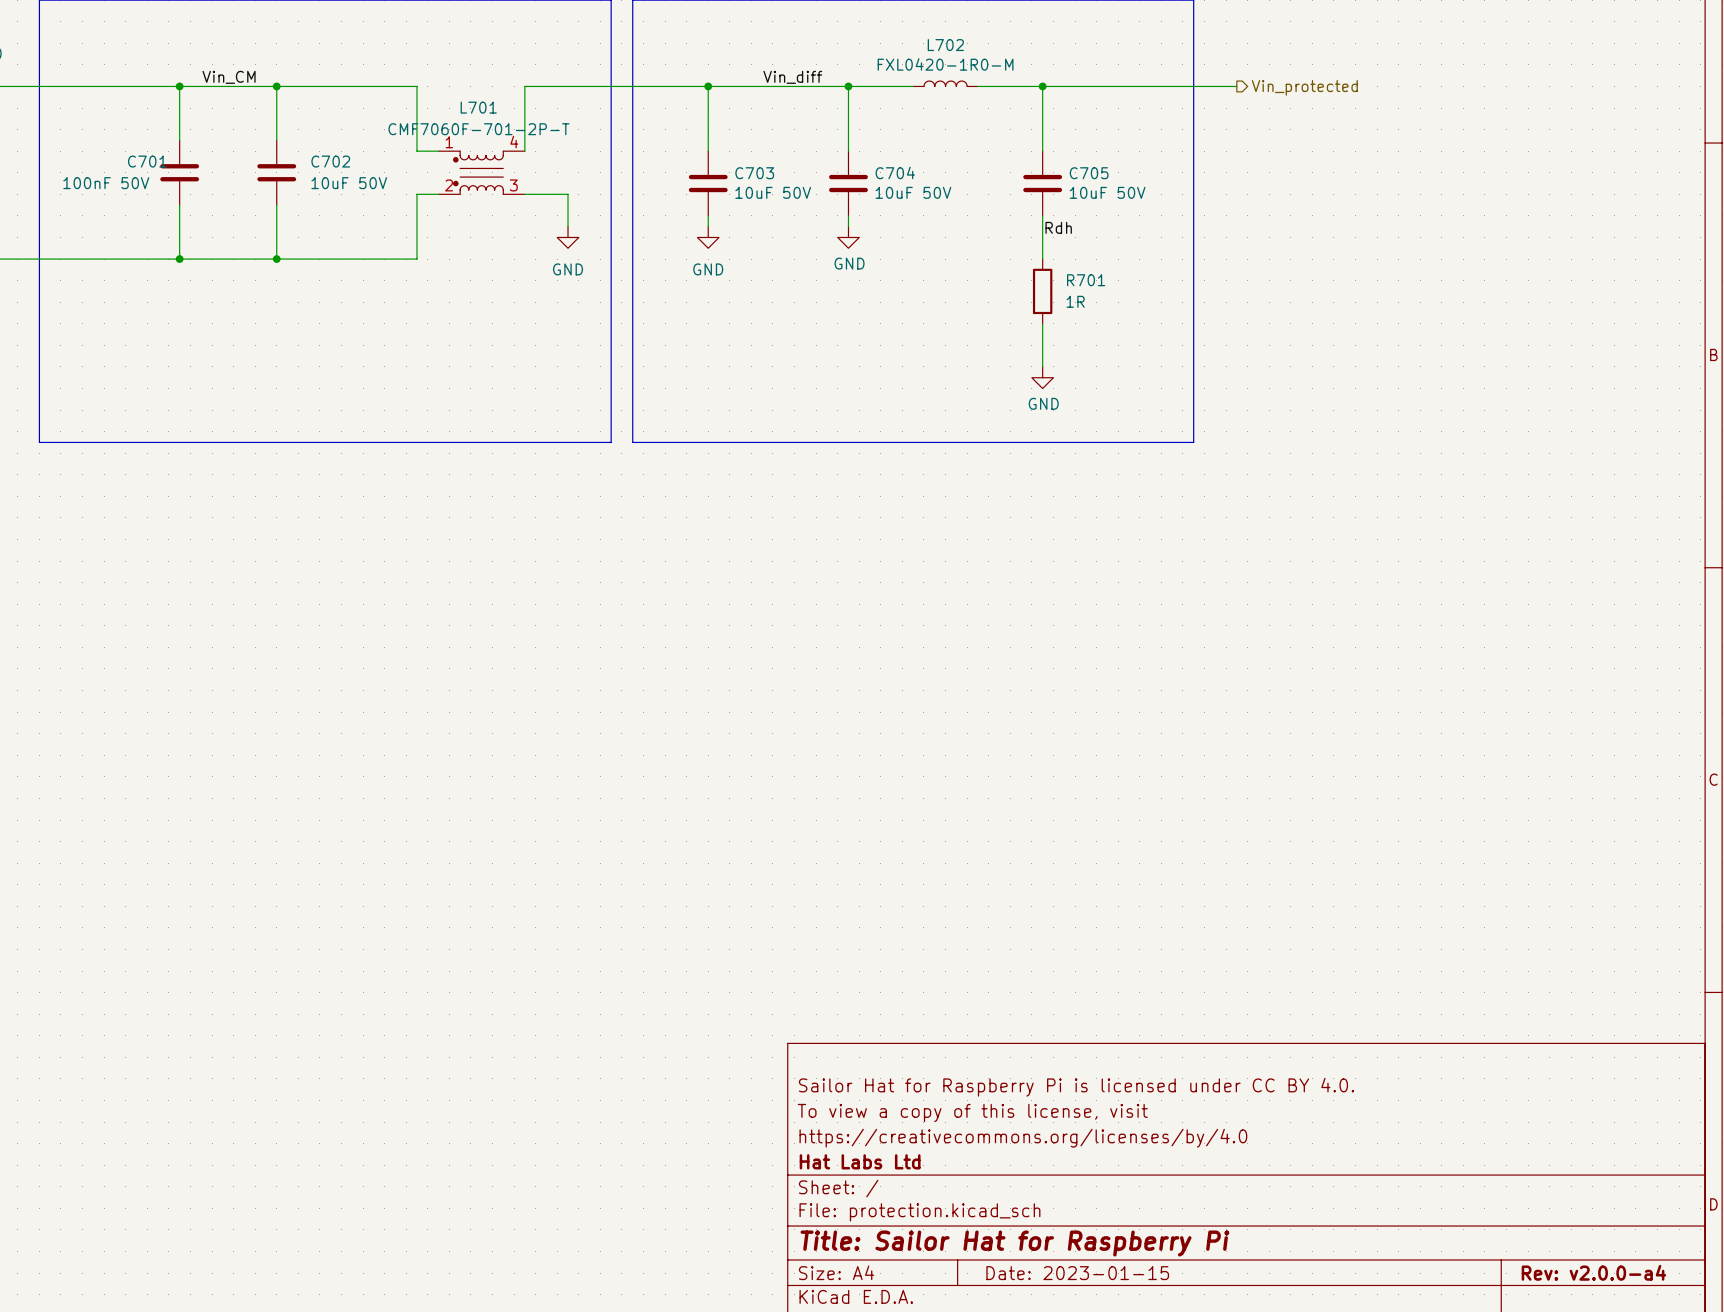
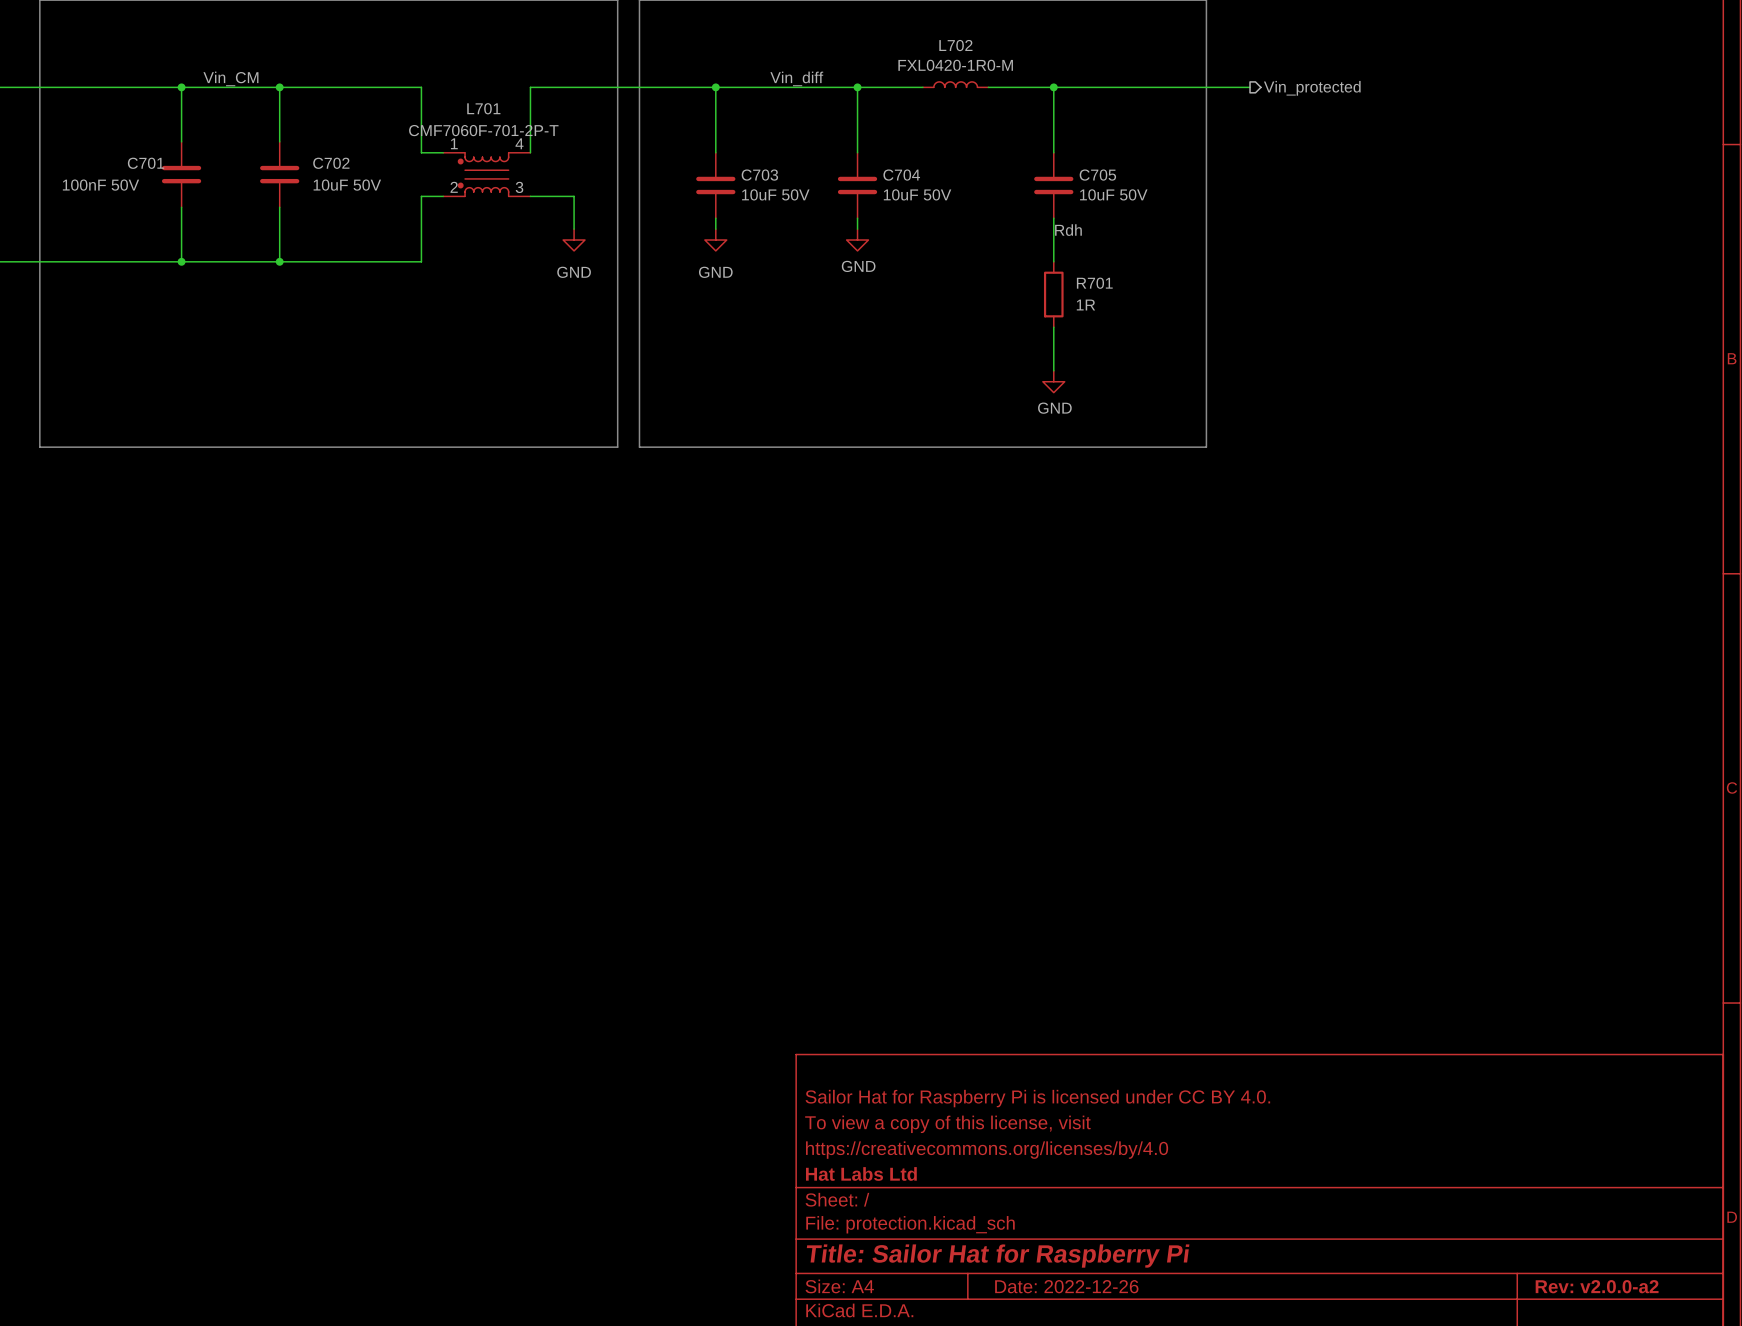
title block: Rev: v2.0.0-a4 (1593, 1272) -> Rev: v2.0.0-a2 (1597, 1286)
title block: Date: 2023-01-15 (1077, 1273) -> Date: 2022-12-26 (1066, 1286)

